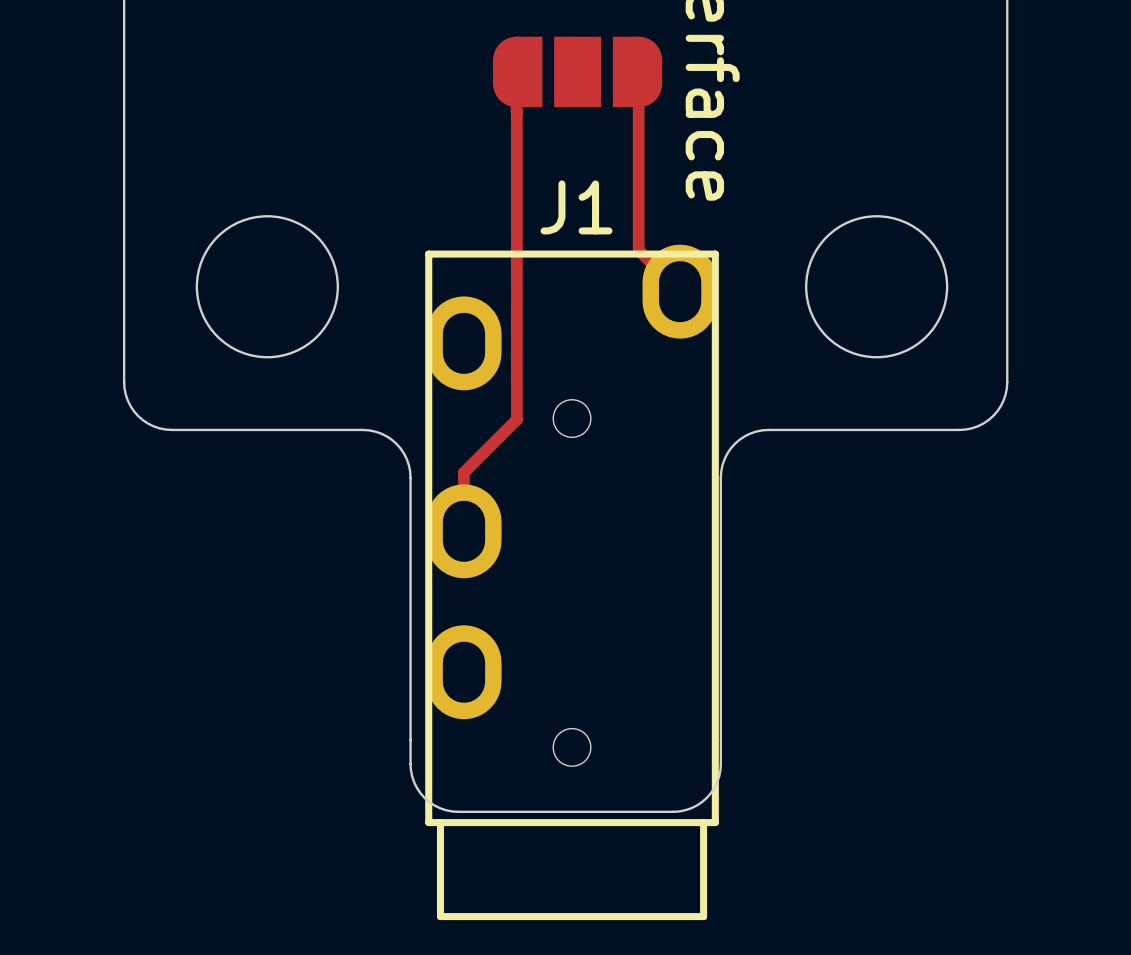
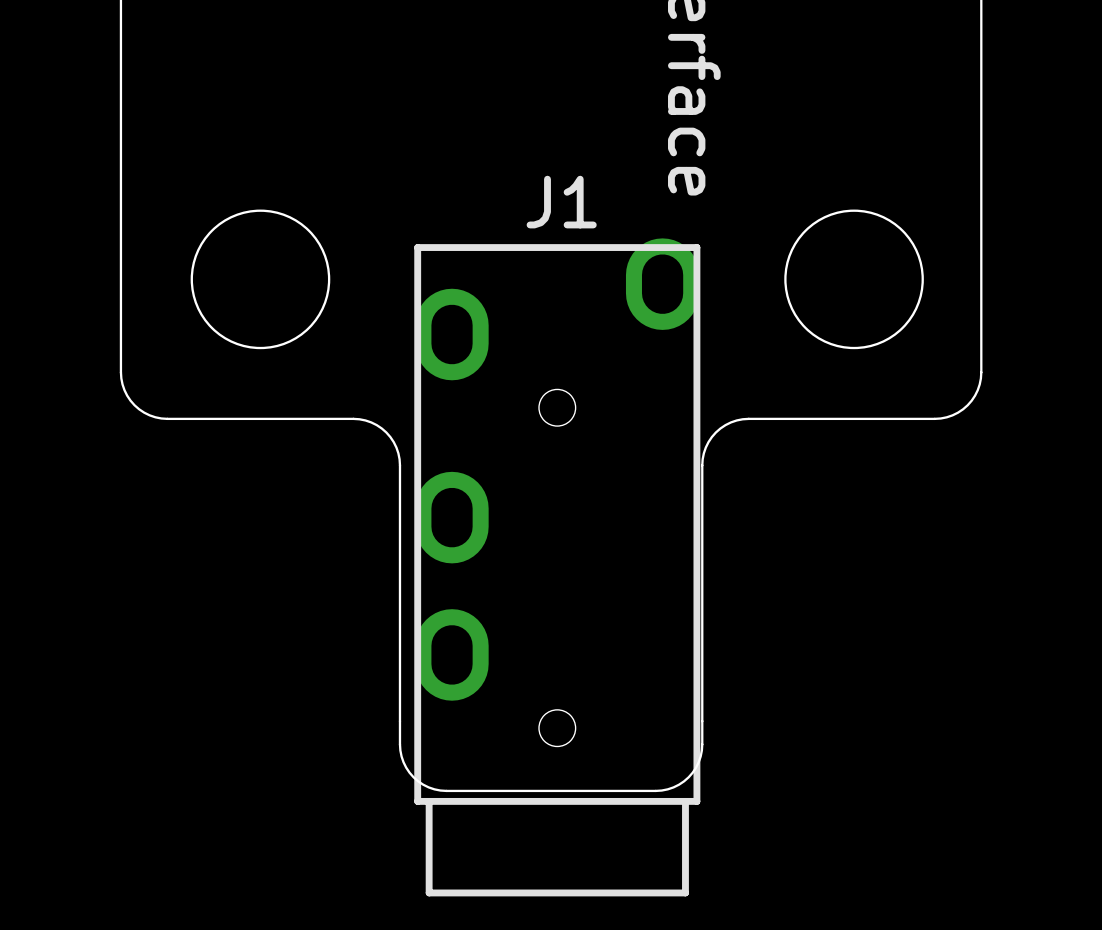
part: (577, 71) -> none
top track: (638, 71) (638, 250) (680, 291) -> none
top track: (516, 112) (516, 419) (463, 472) (463, 531) -> none

